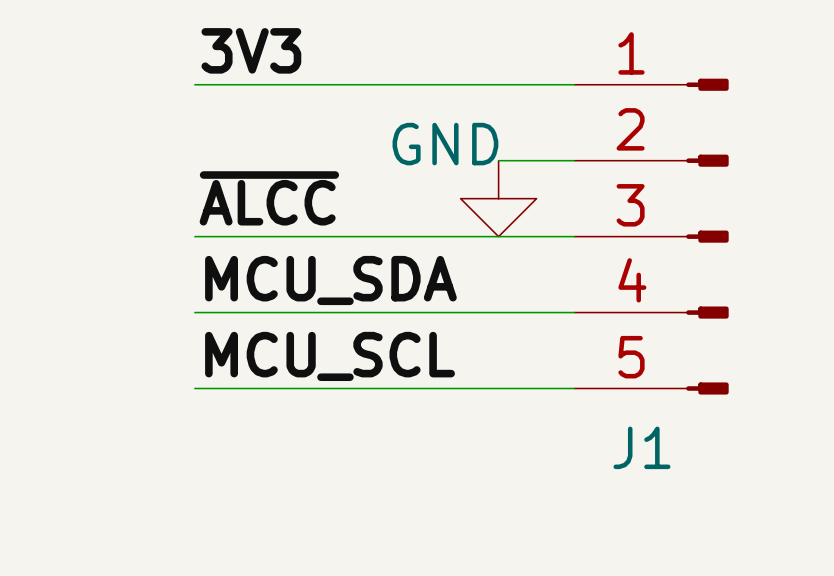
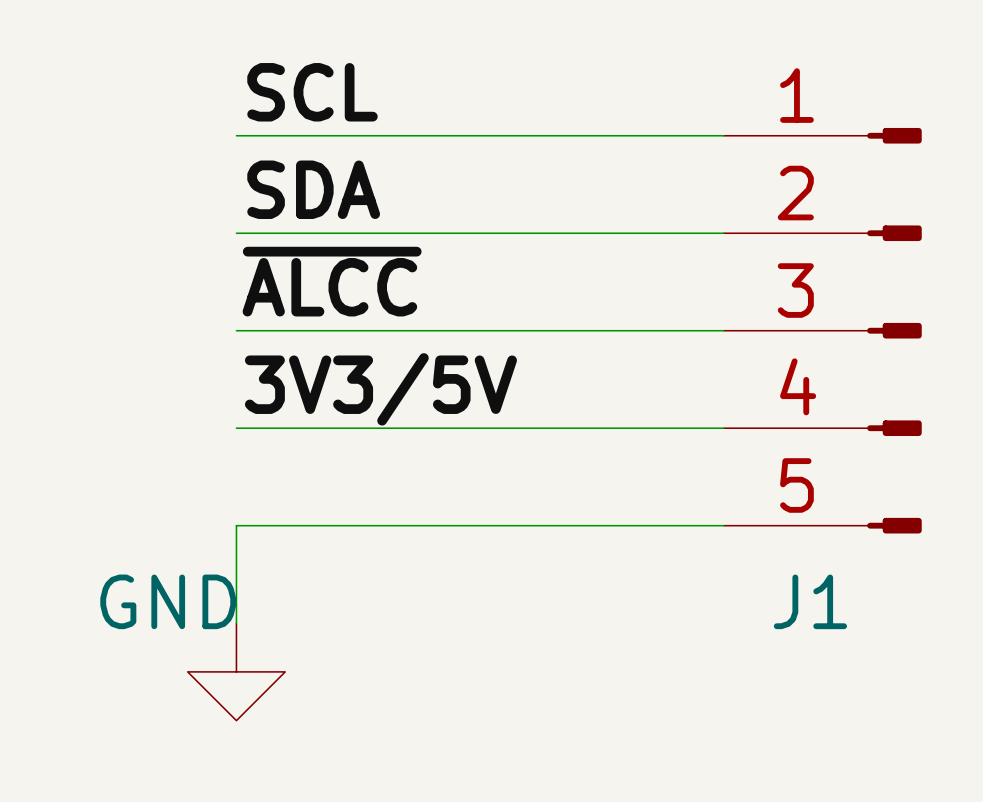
label: 3V3 (251, 50) -> SCL (312, 92)
label: none -> SDA (313, 189)
wire: none -> (236, 233) (626, 233)
power symbol position: GND (498, 198) -> GND (236, 671)
label: MCU_SDA (330, 280) -> 3V3/5V (380, 389)
label: MCU_SCL (330, 356) -> none
wire: none -> (236, 525) (236, 623)

